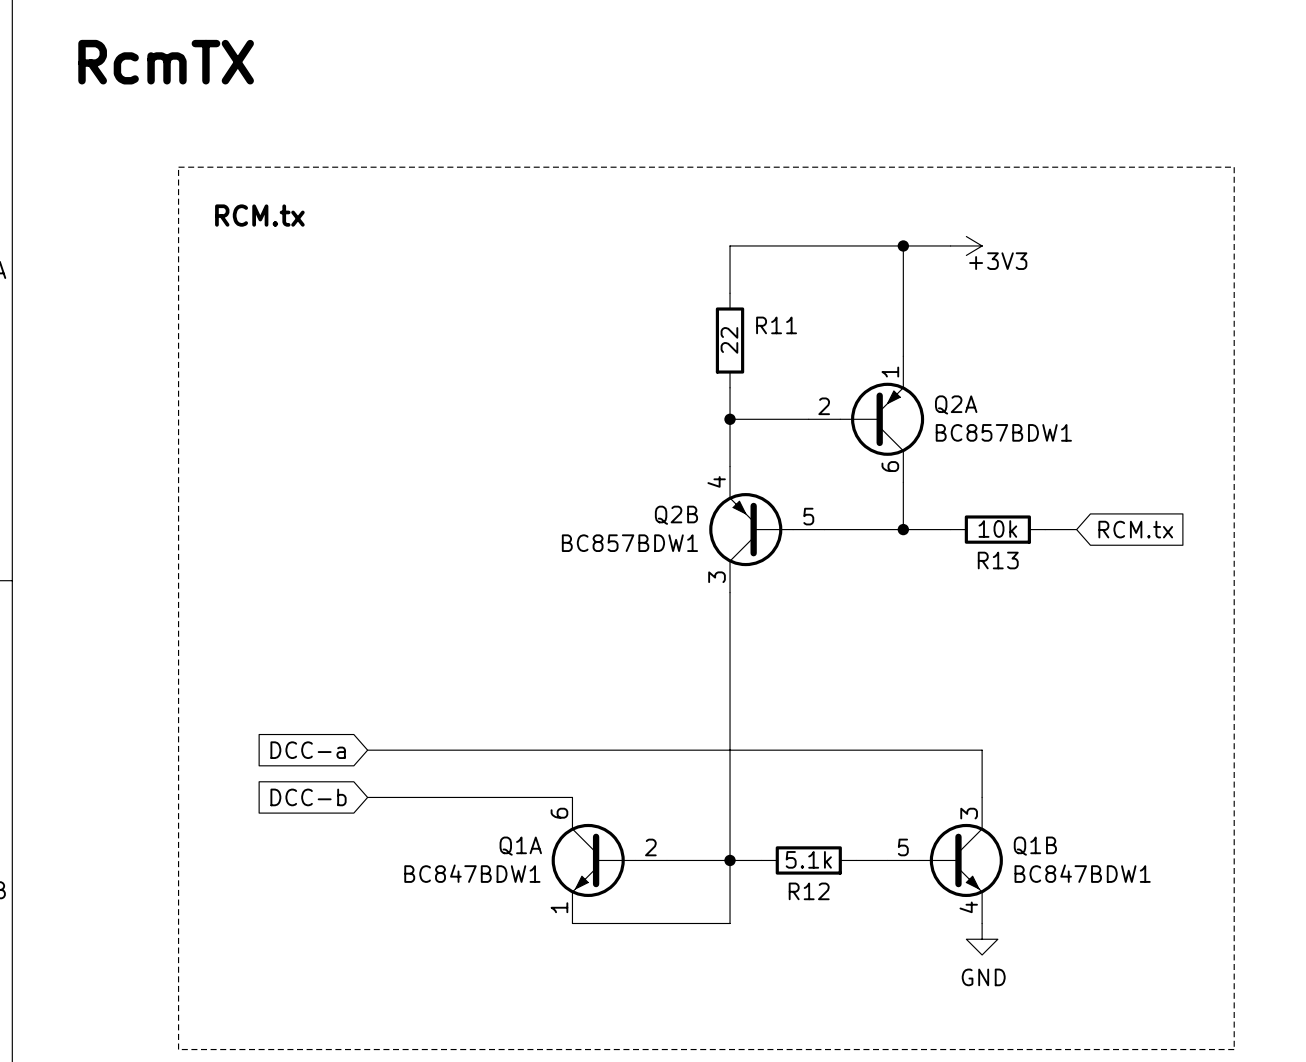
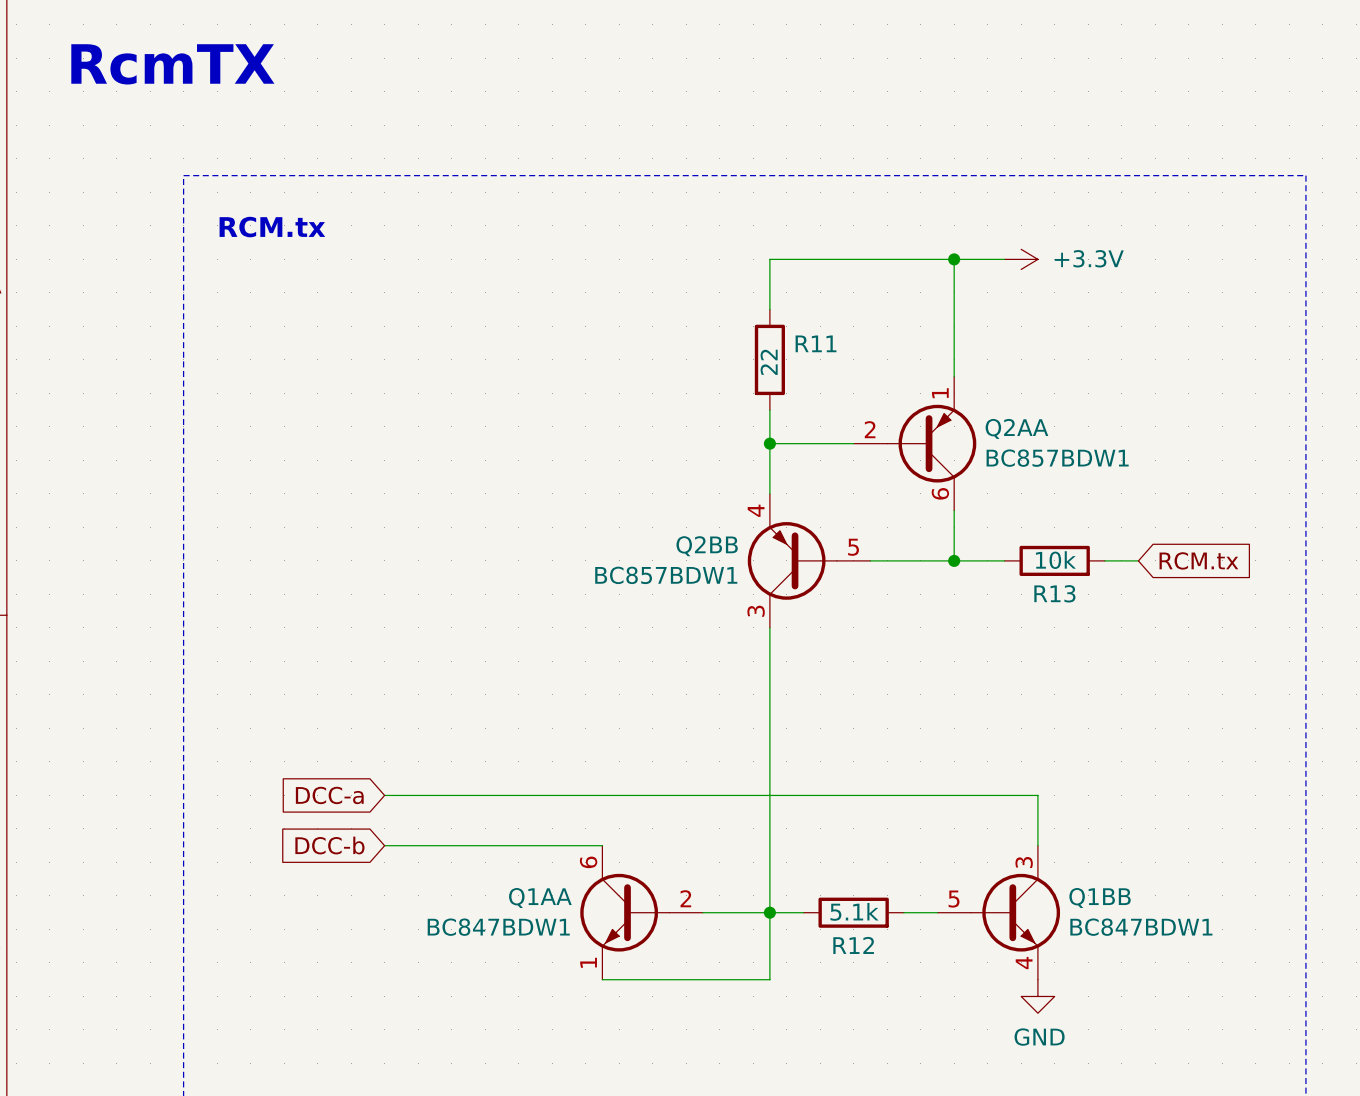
power symbol: +3V3 (966, 245) -> +3.3V (1021, 259)
Q2A name: Q2A (956, 404) -> Q2AA (1016, 428)
Q2B name: Q2B (676, 515) -> Q2BB (707, 546)
Q1A name: Q1A (520, 846) -> Q1AA (540, 898)
Q1B name: Q1B (1035, 846) -> Q1BB (1100, 898)

